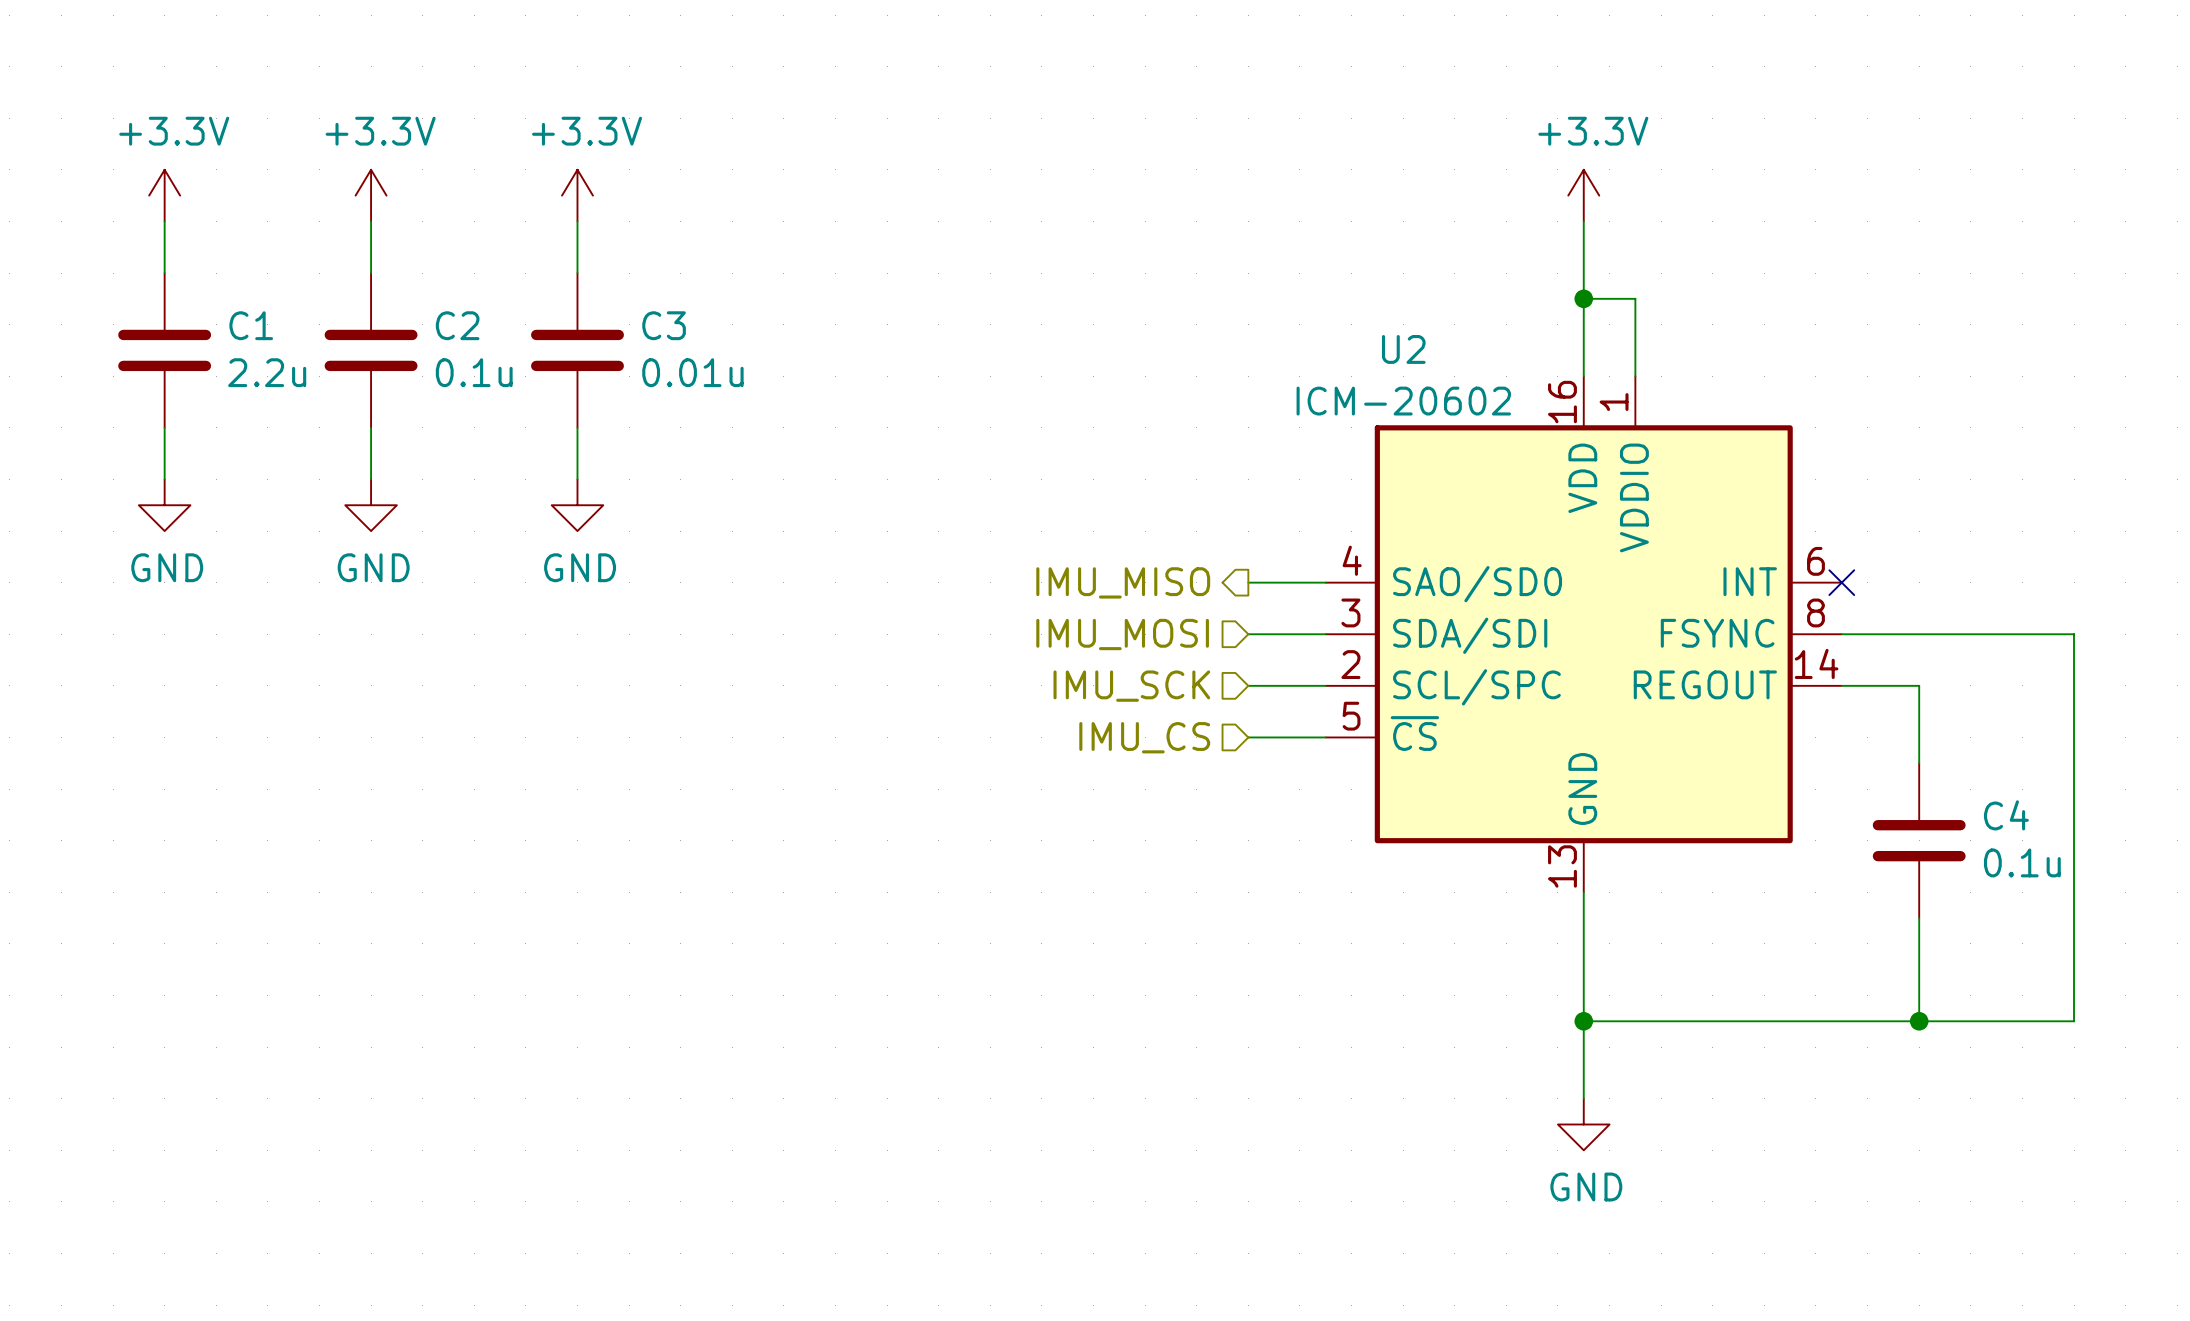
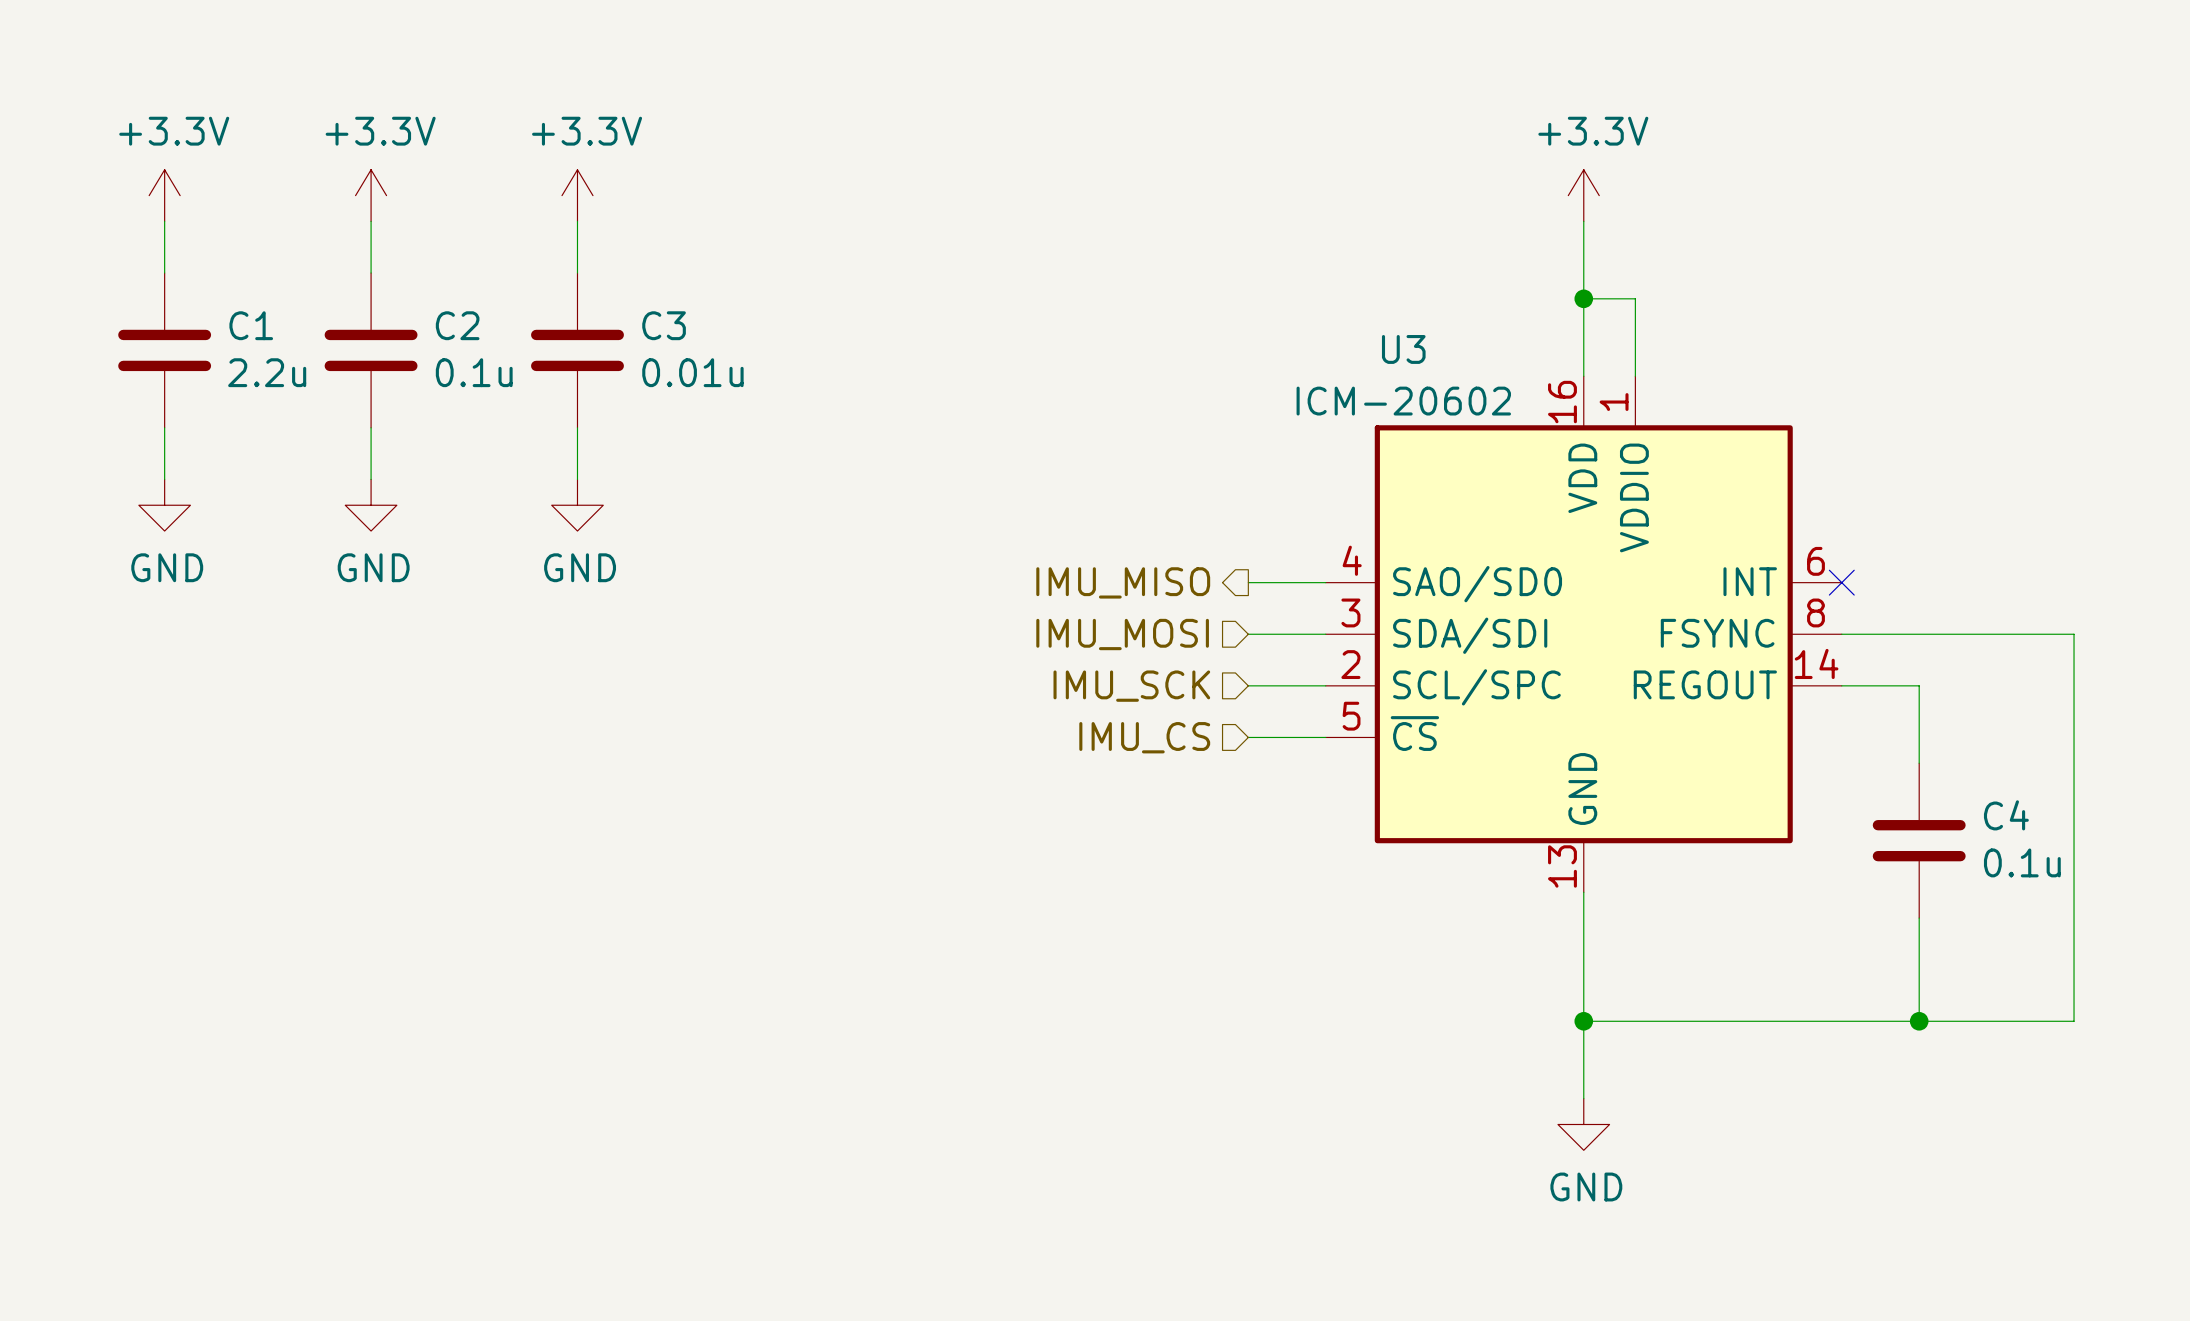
U2 name: U2 (1403, 349) -> U3 (1403, 349)

